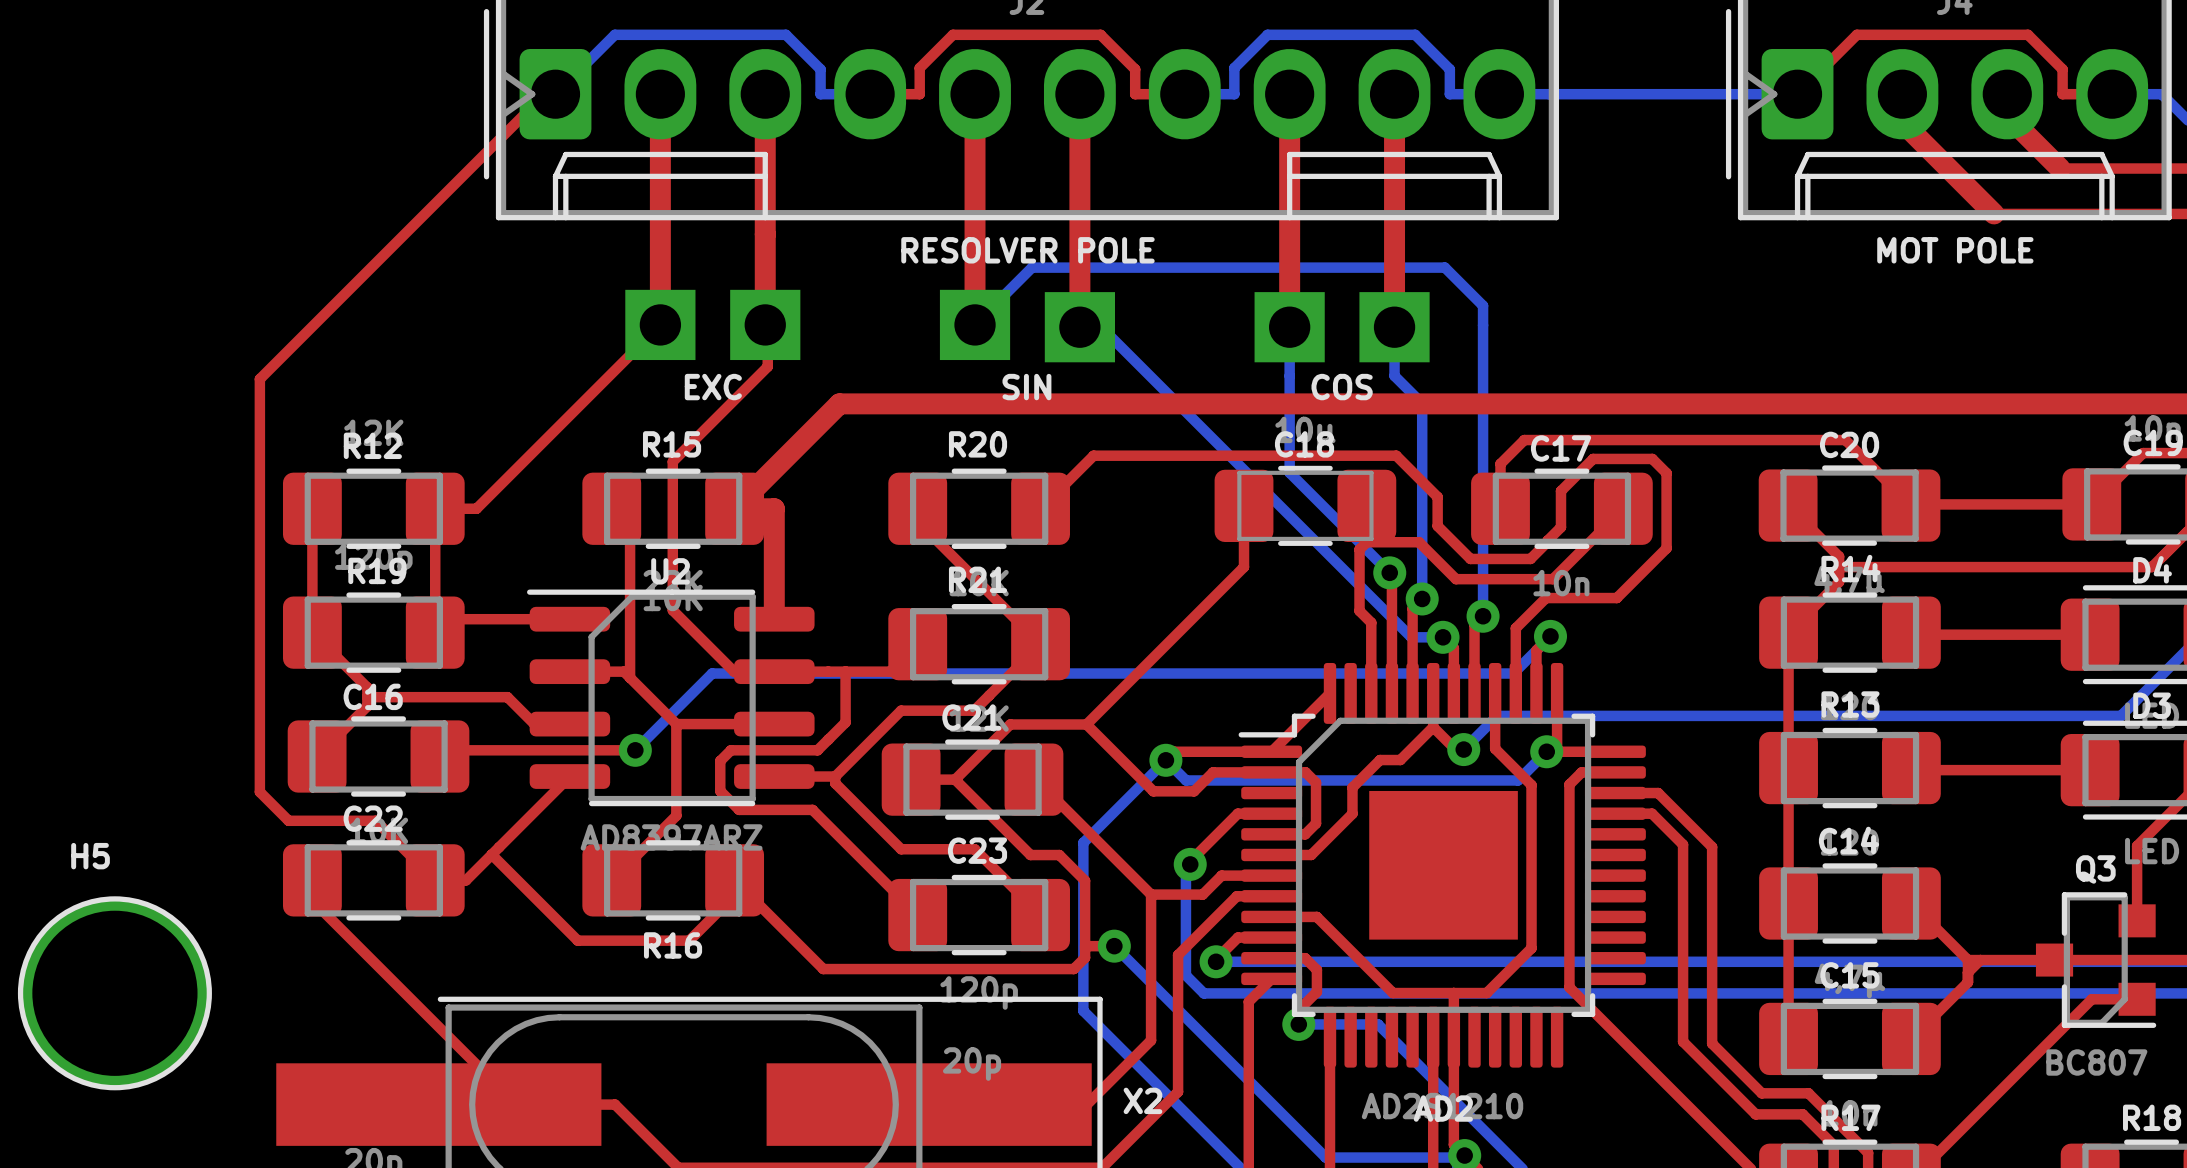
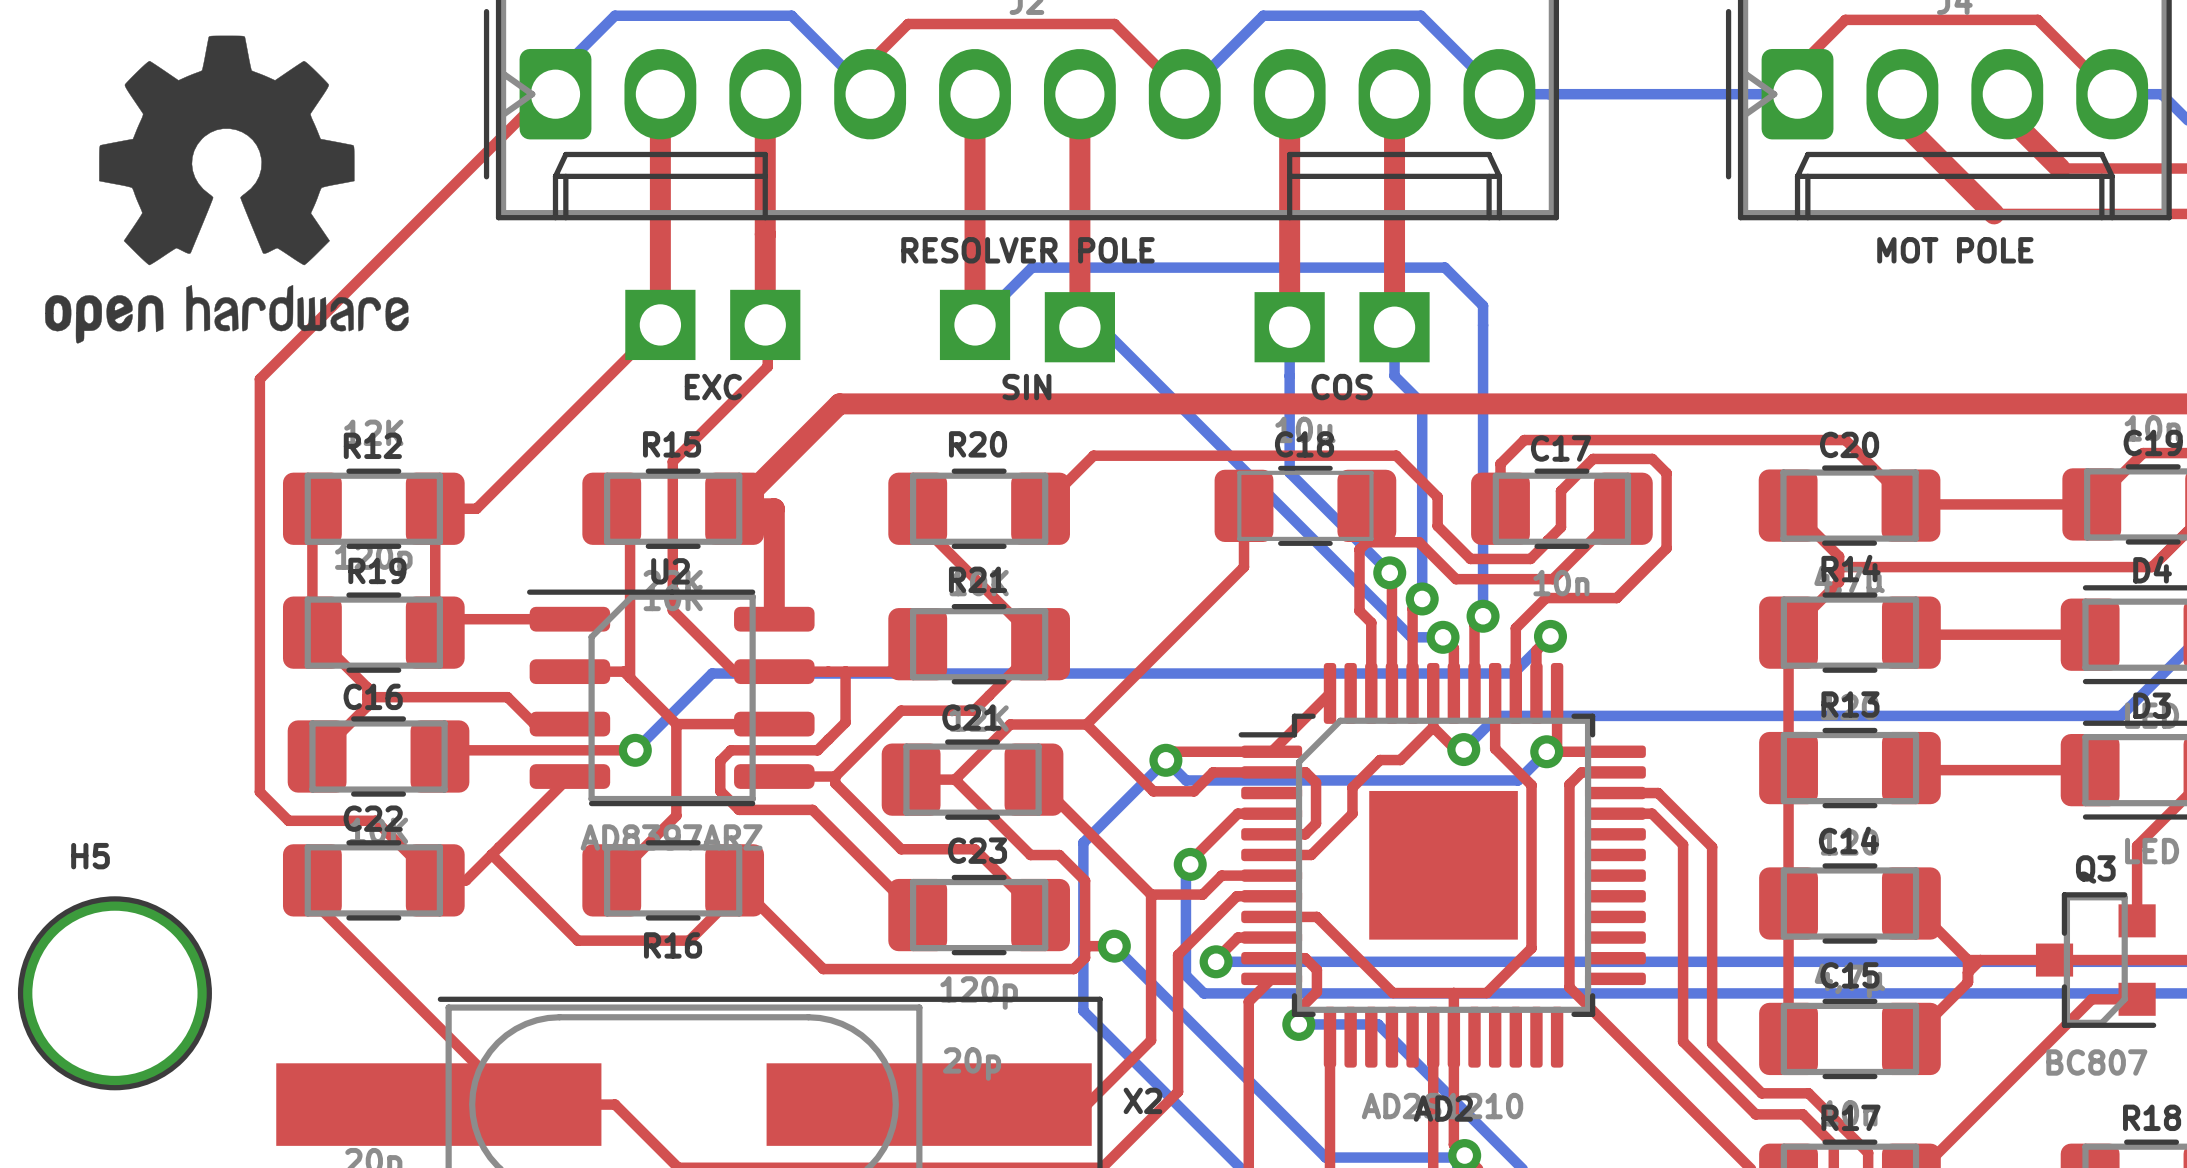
drawing: none -> [45, 35, 409, 344]
bottom track: (555, 94) (614, 34) (785, 34) (820, 69) (820, 94) (870, 94) -> (555, 94) (555, 75) (614, 15) (791, 15) (870, 94)
top track: (870, 94) (919, 94) (919, 68) (952, 34) (1100, 34) (1135, 69) (1135, 94) (1184, 94) -> (870, 94) (870, 61) (908, 24) (1114, 24) (1184, 94)
bottom track: (1184, 94) (1234, 94) (1234, 68) (1267, 34) (1415, 34) (1449, 69) (1449, 94) (1499, 94) -> (1184, 94) (1263, 15) (1420, 15) (1499, 94)
top track: (1797, 94) (1856, 34) (2027, 34) (2062, 69) (2062, 94) (2112, 94) -> (1797, 94) (1797, 67) (1845, 19) (2037, 19) (2112, 94)

